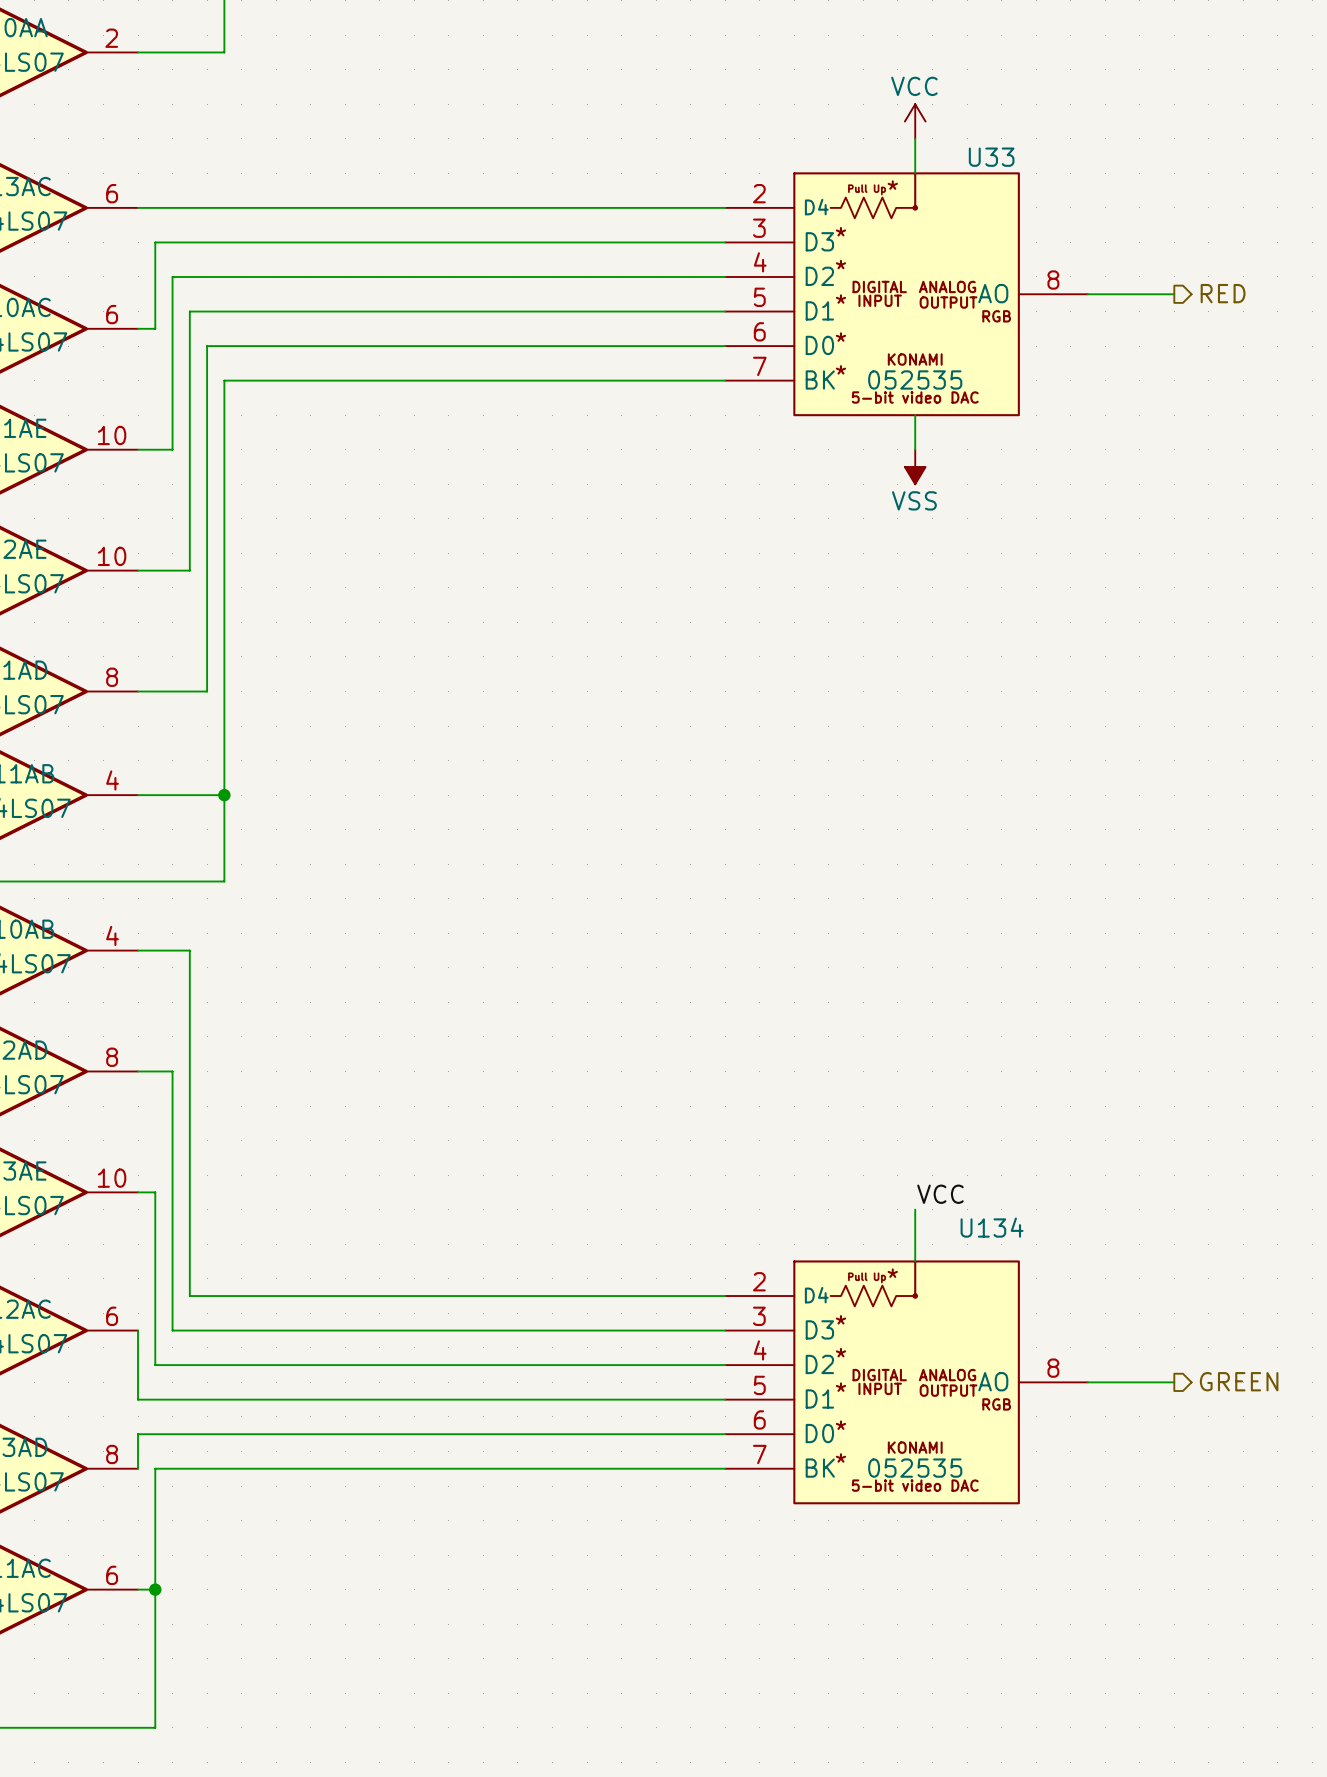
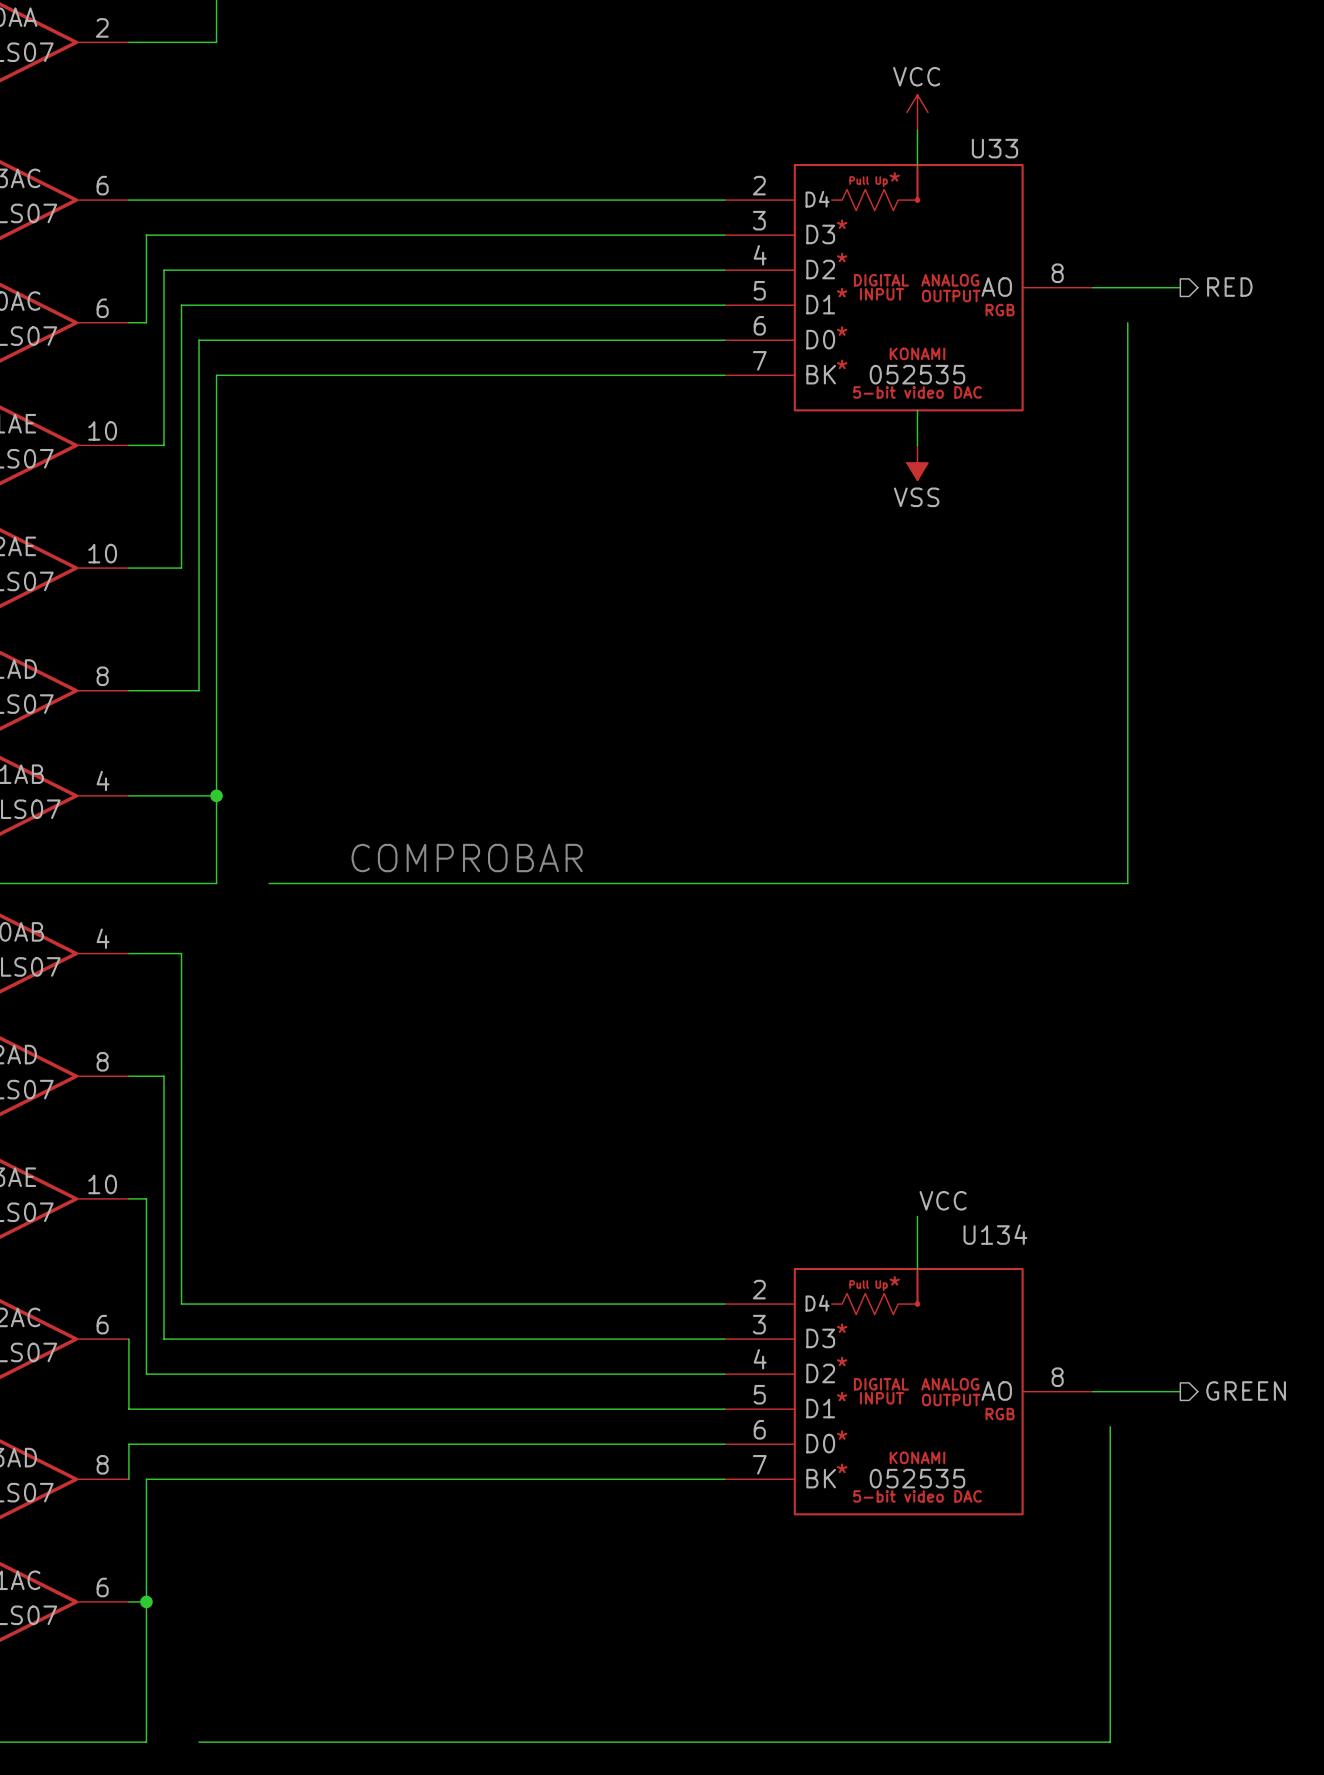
wire: none -> (1127, 322) (1127, 883) (269, 883)
text: none -> COMPROBAR (467, 858)
wire: none -> (1110, 1426) (1110, 1742) (199, 1742)

